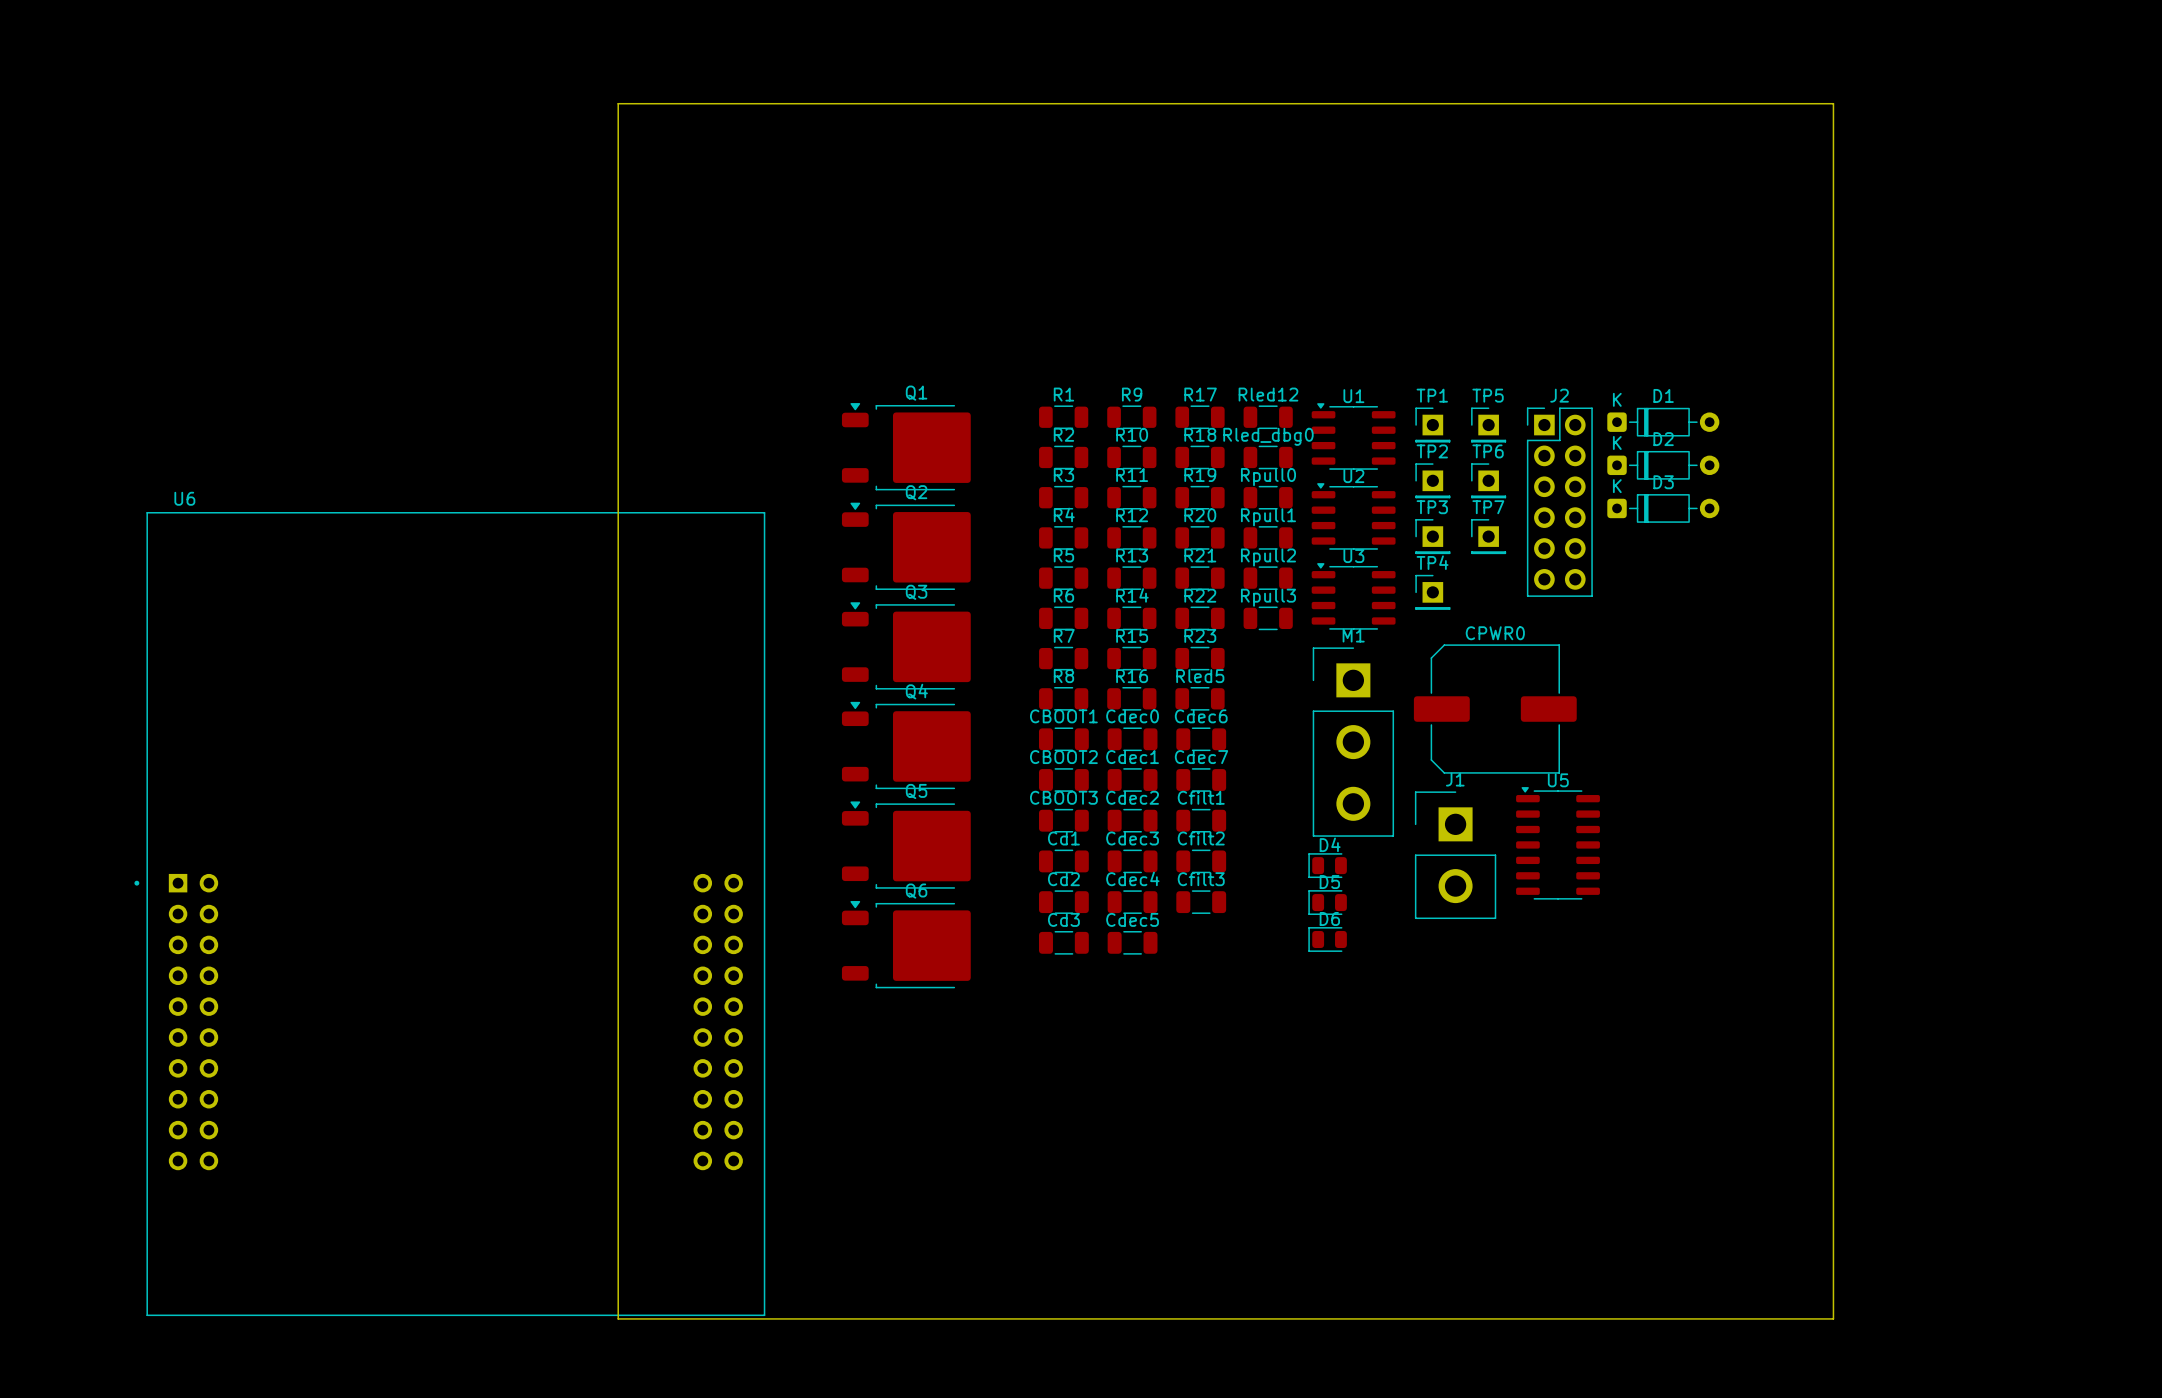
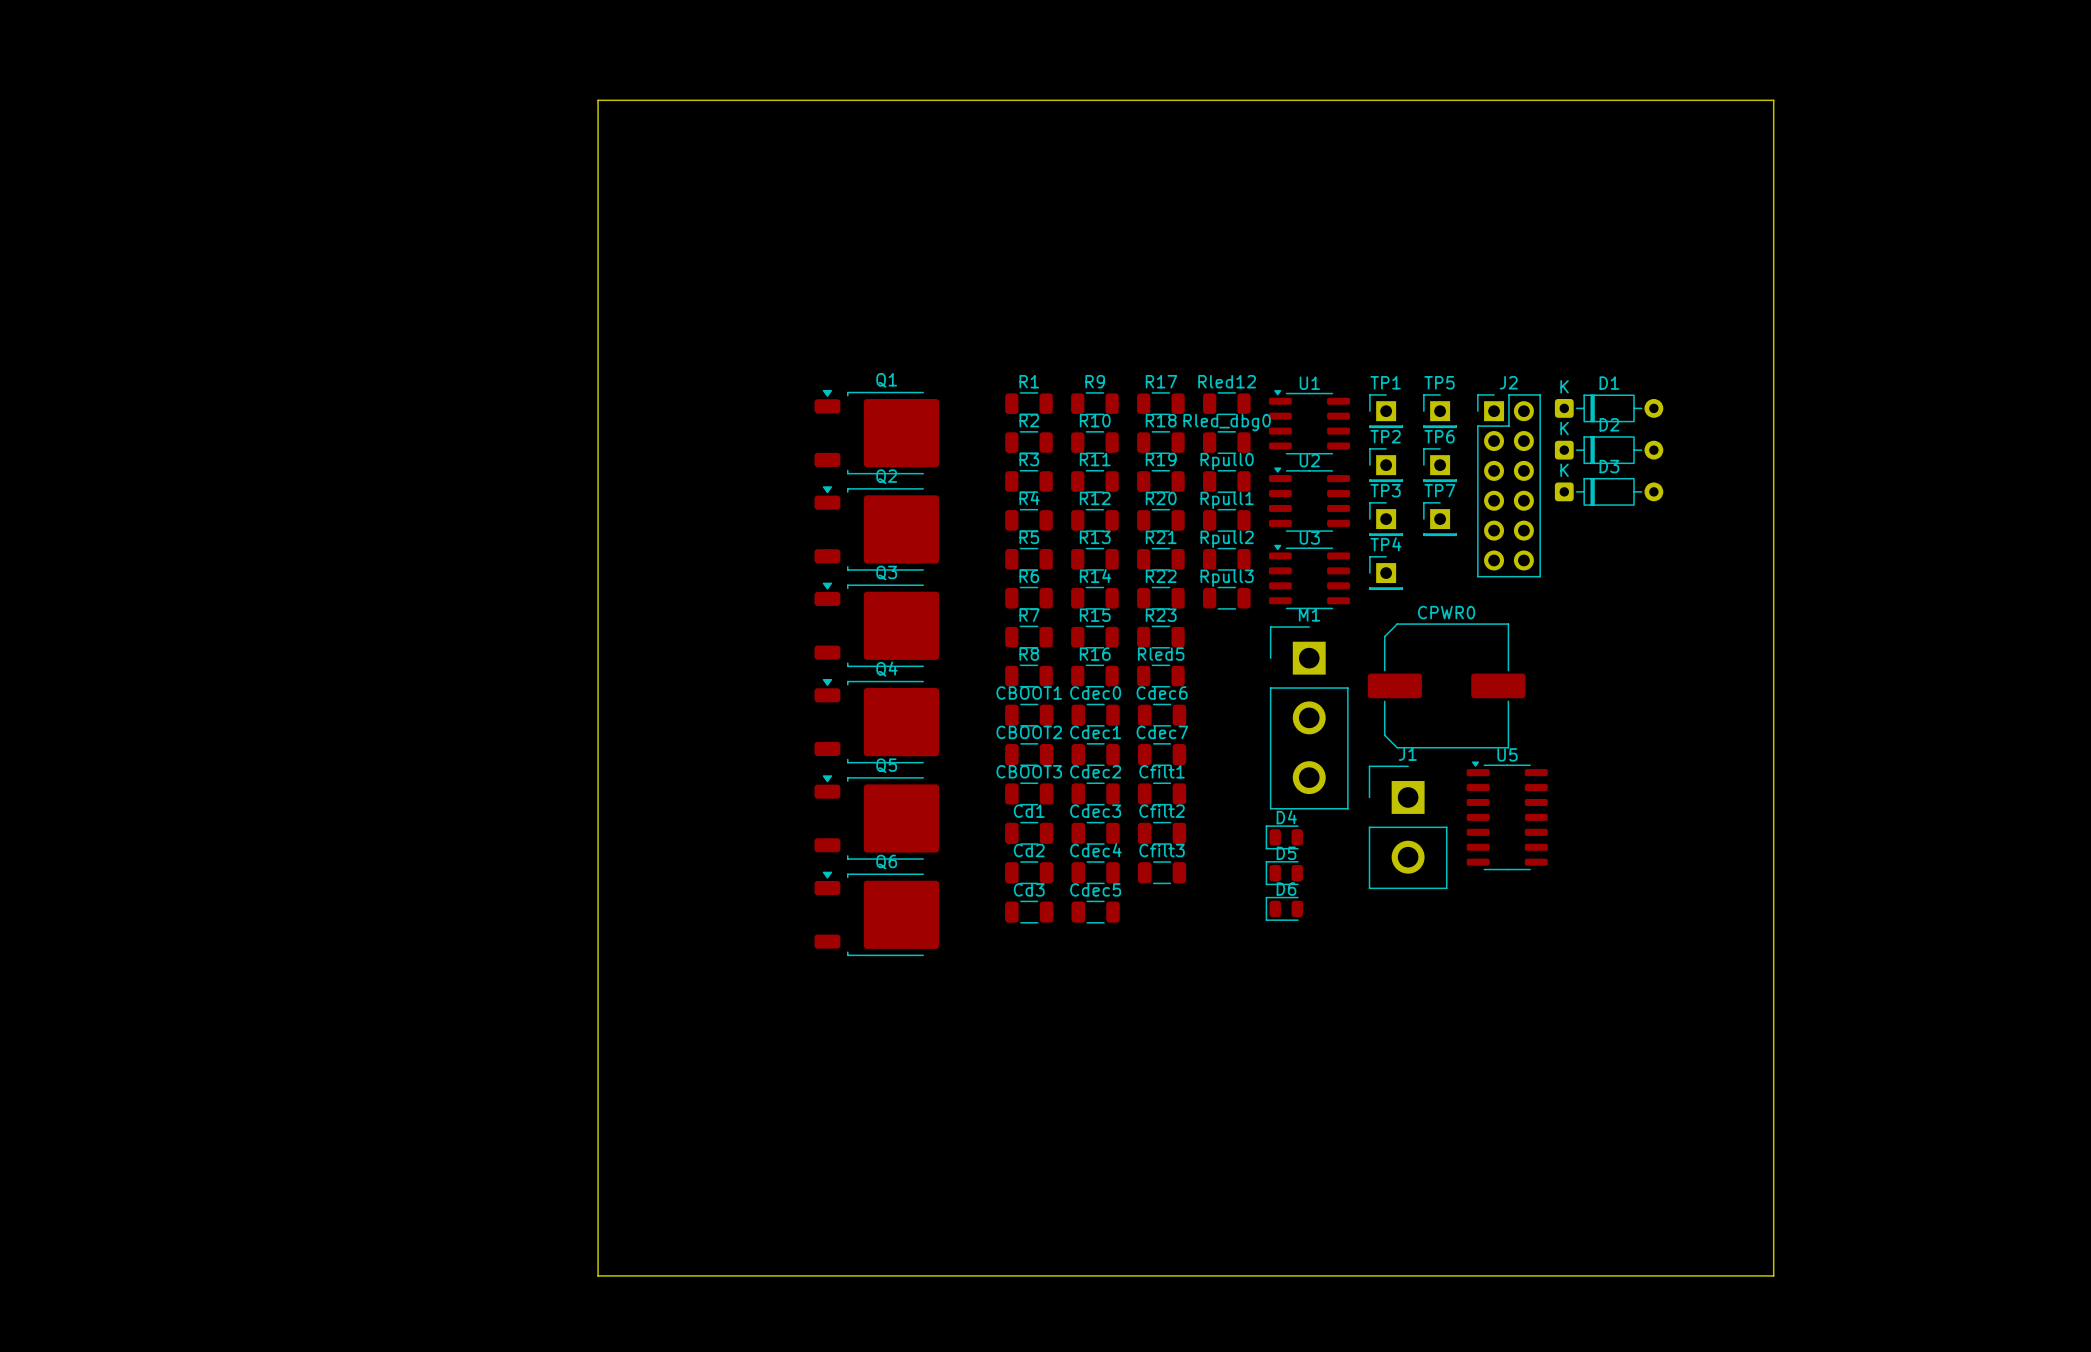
U6: (449, 914) -> none

